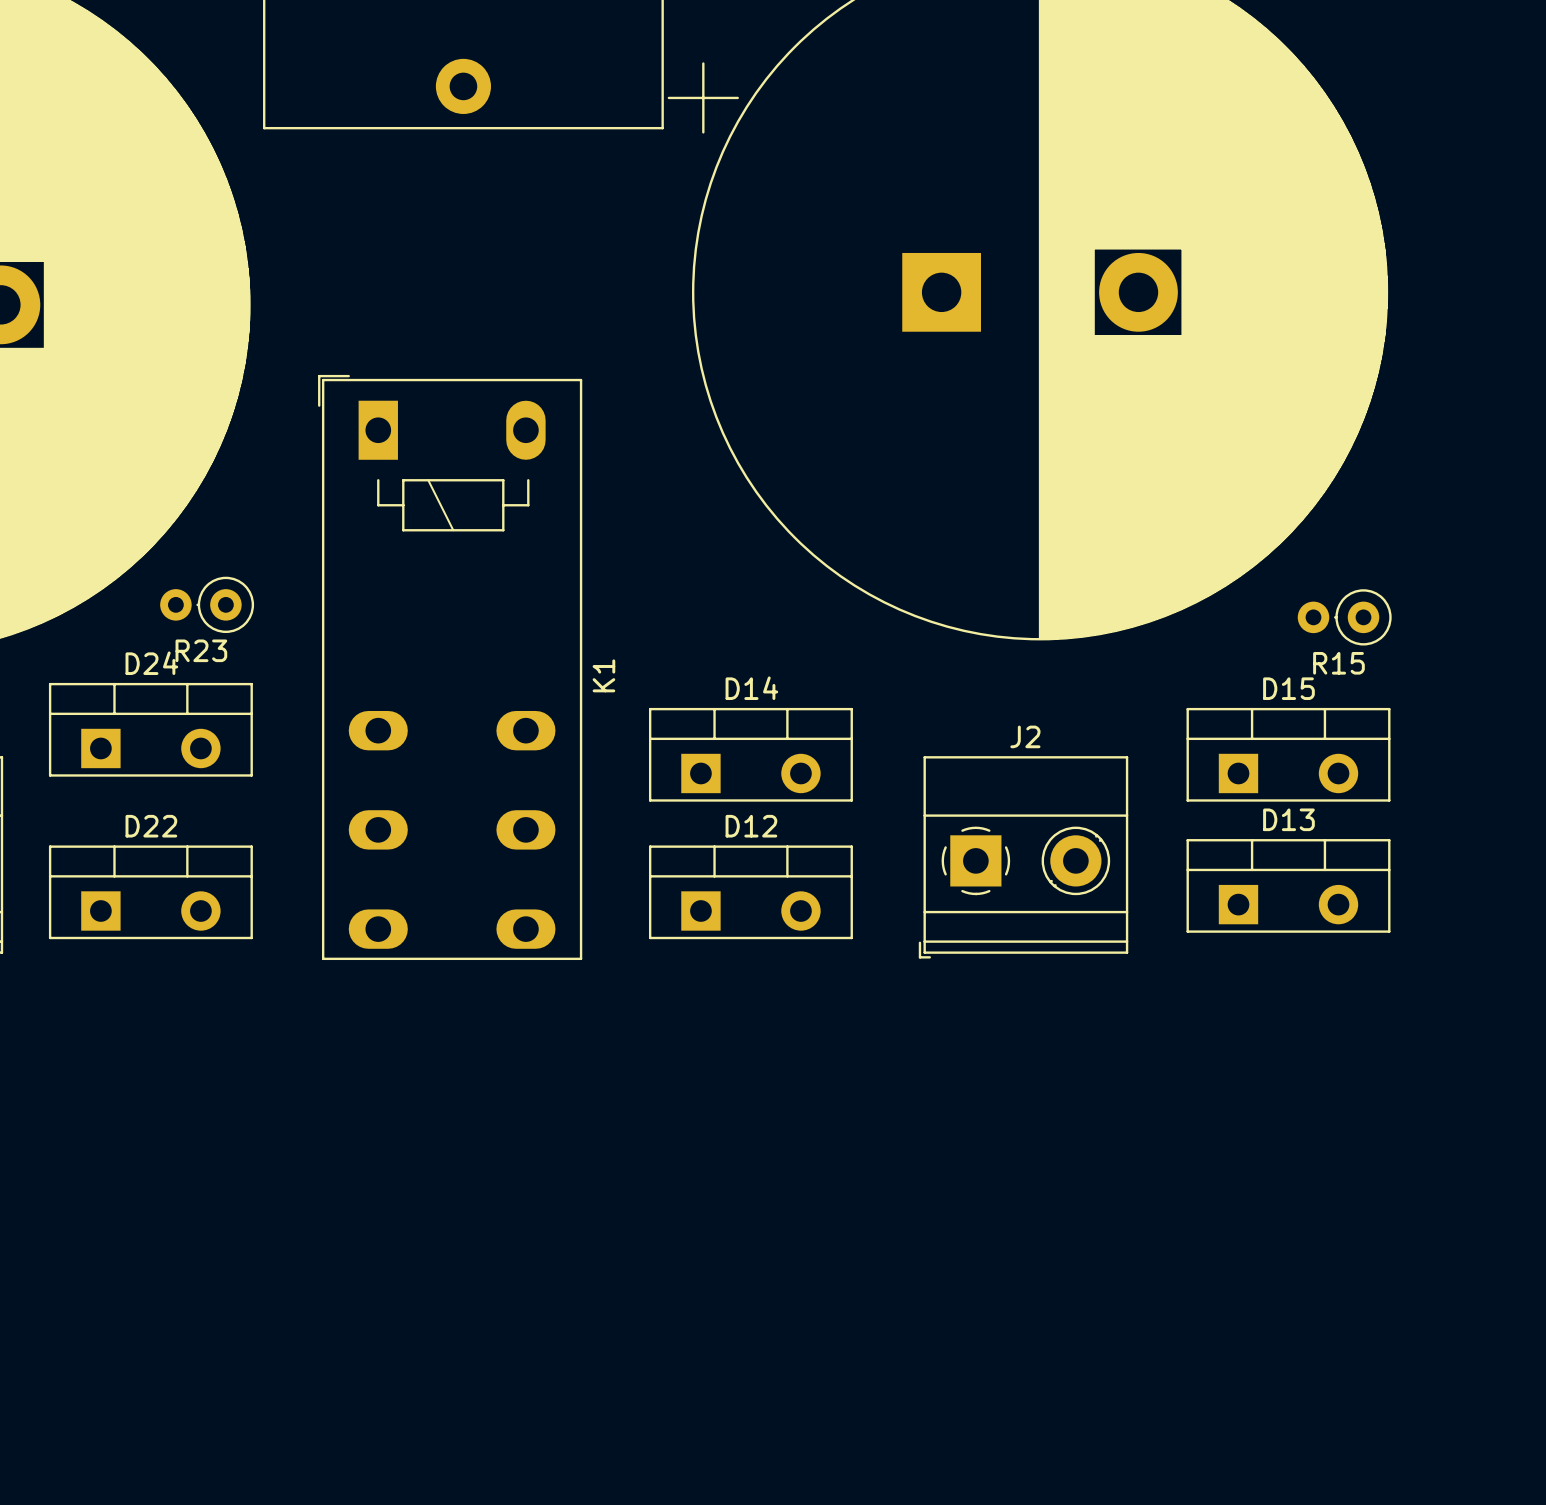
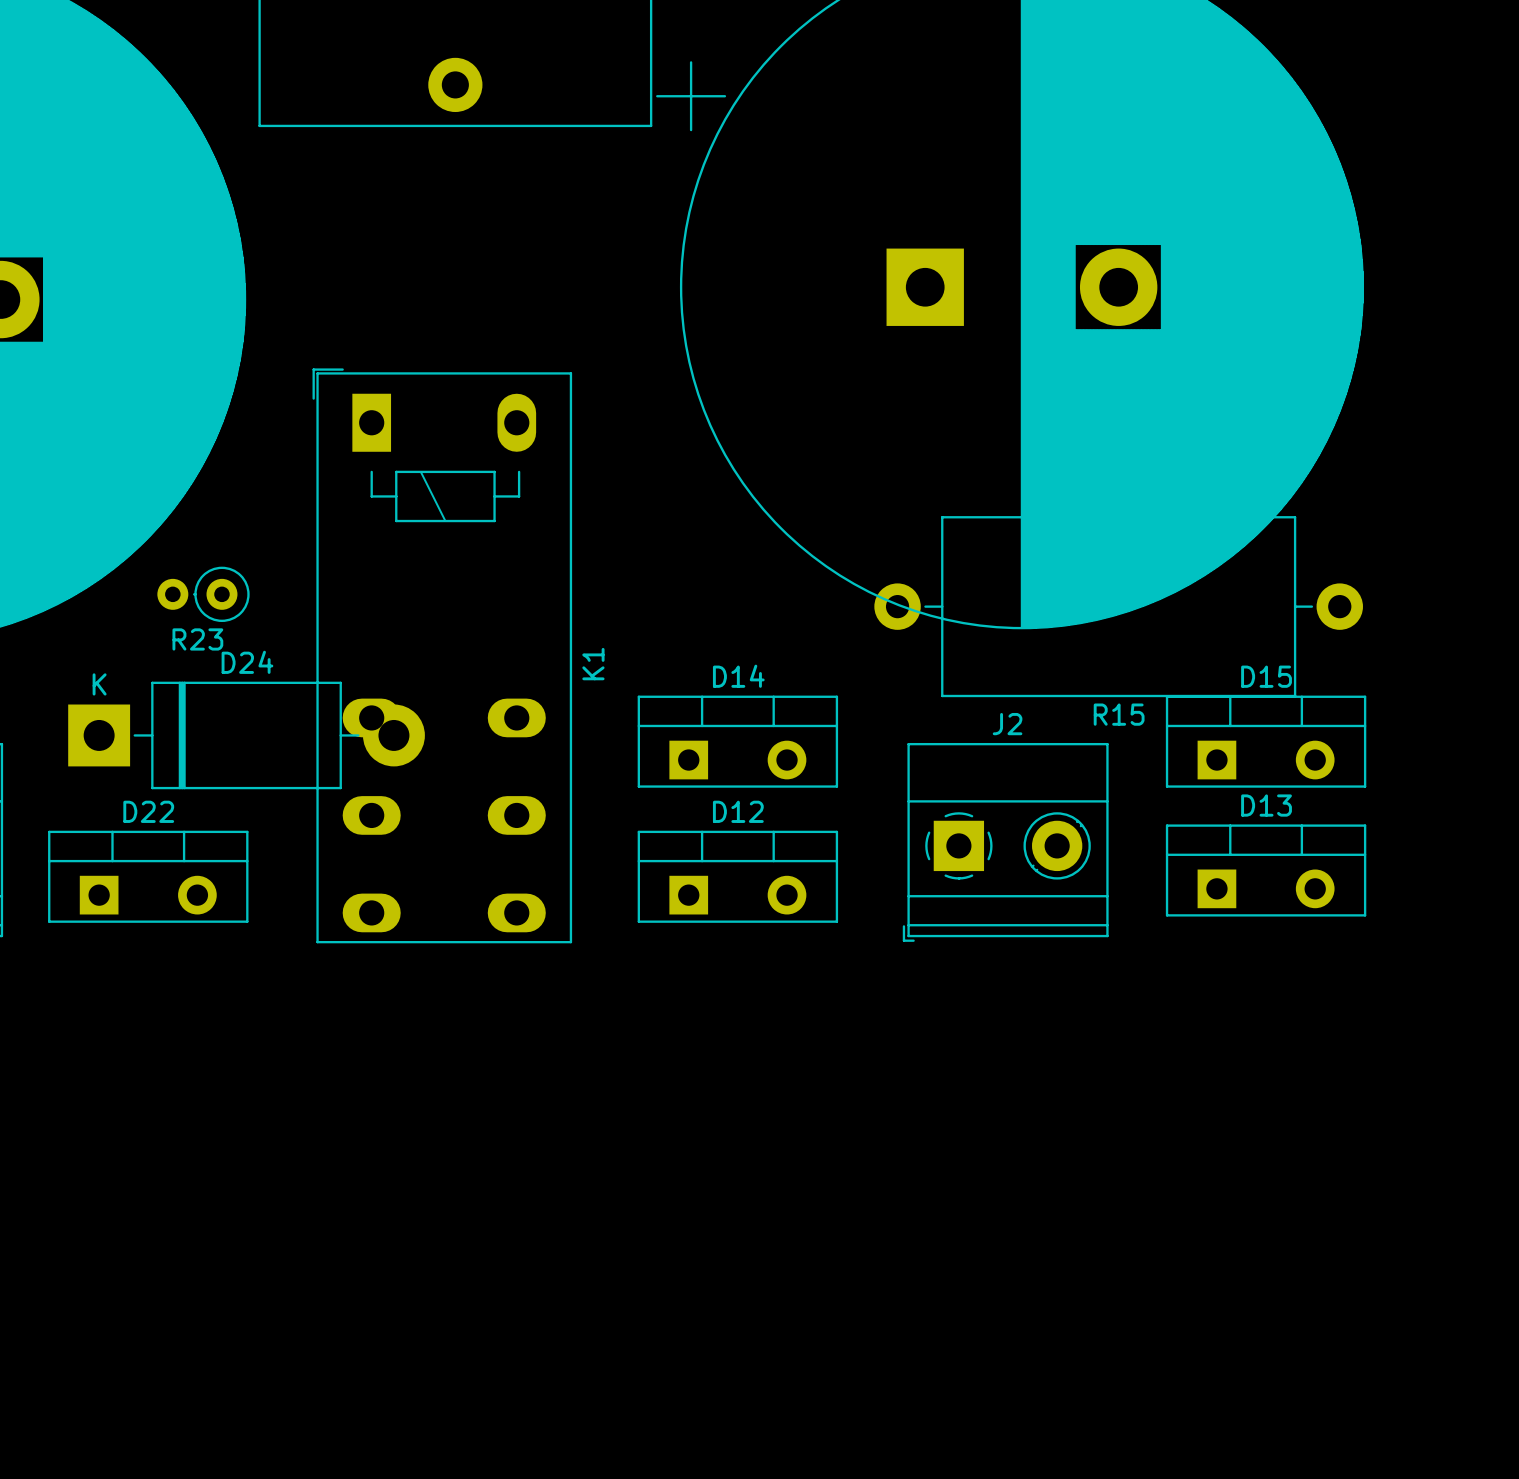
R15 footprint: [1297, 589, 1392, 646] -> [874, 516, 1363, 698]
R15 name position: R15 (1338, 663) -> R15 (1119, 714)
D24 footprint: [48, 682, 253, 777] -> [68, 681, 425, 790]

